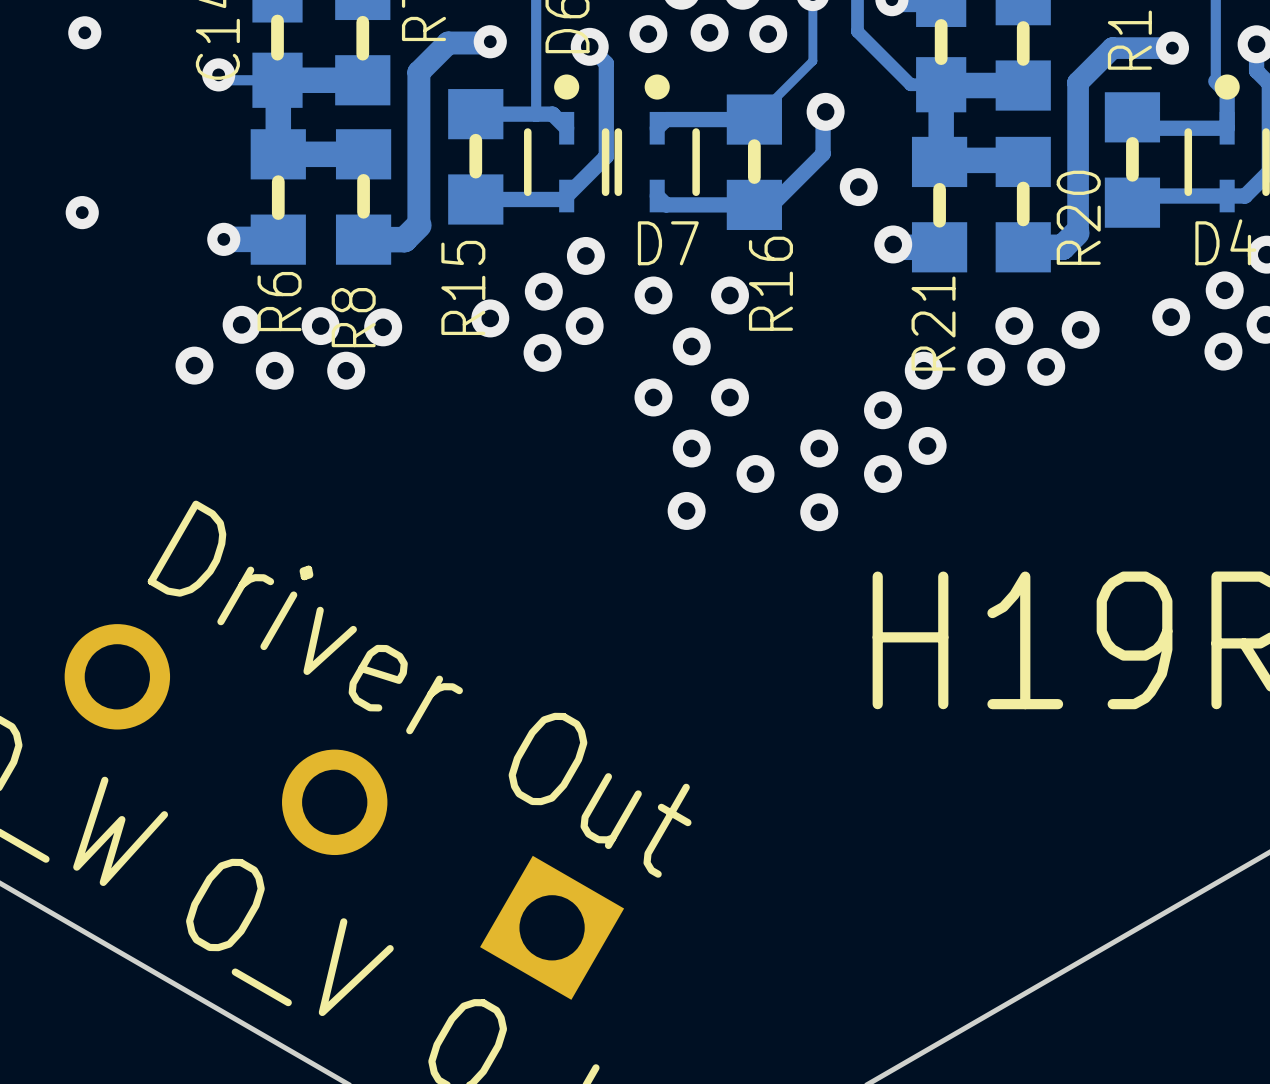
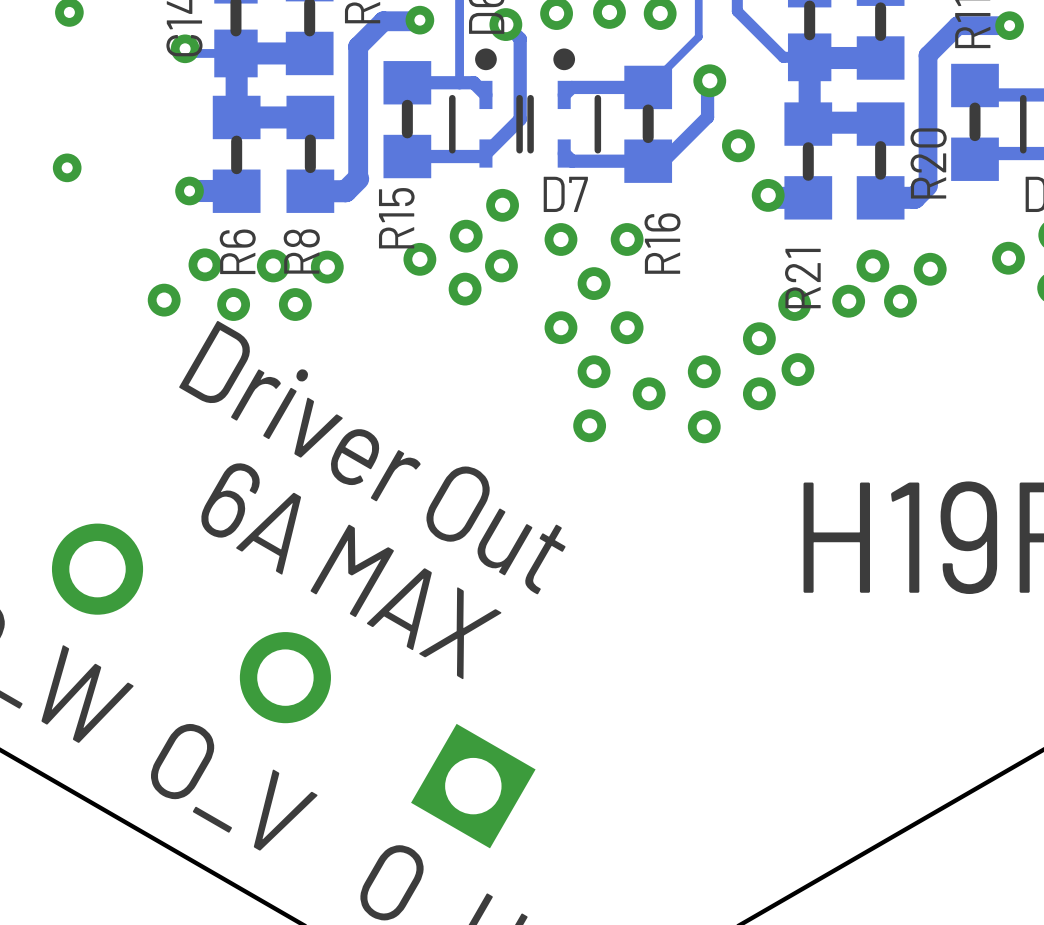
text: none -> 6A MAX (350, 570)
text position: Driver Out (419, 689) -> Driver Out (372, 457)

